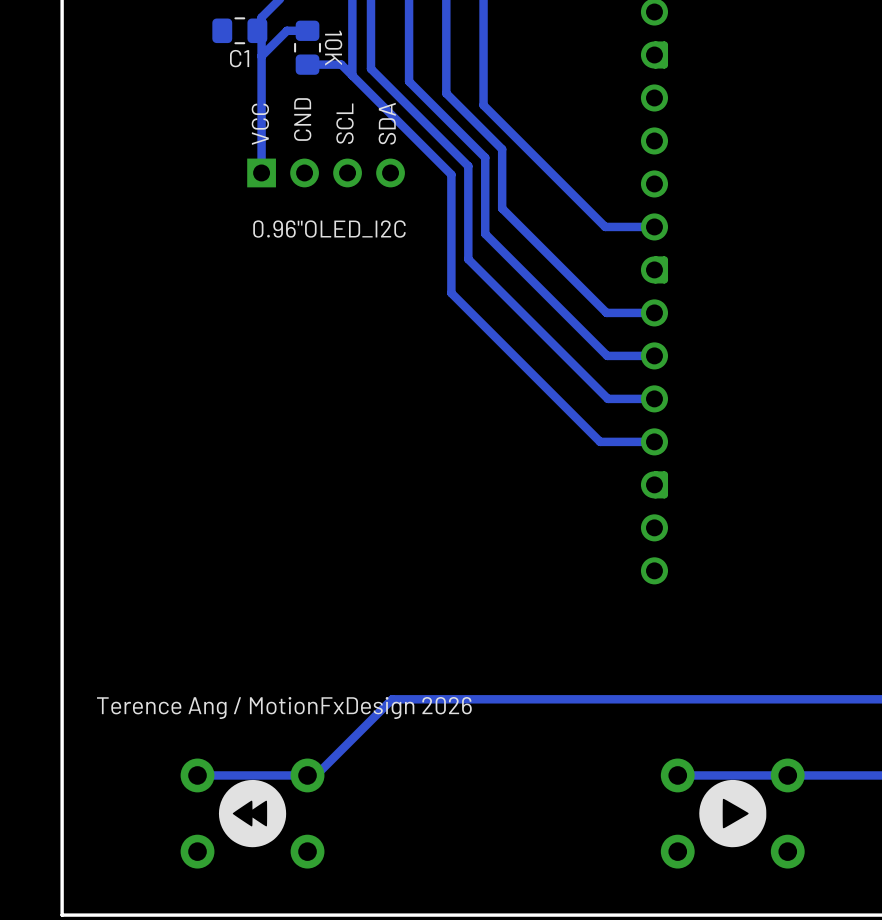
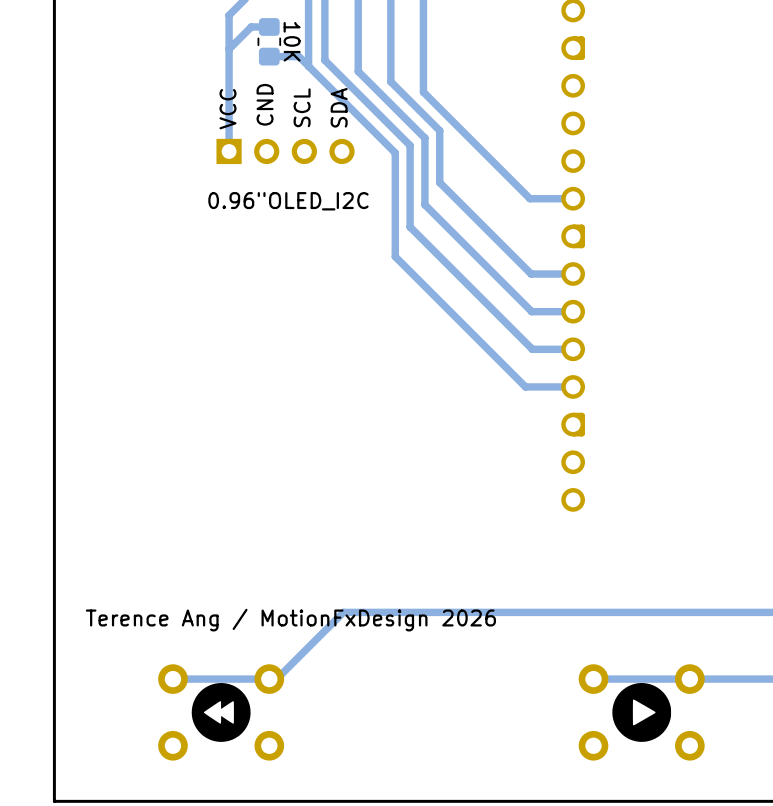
C1: (239, 30) -> none

